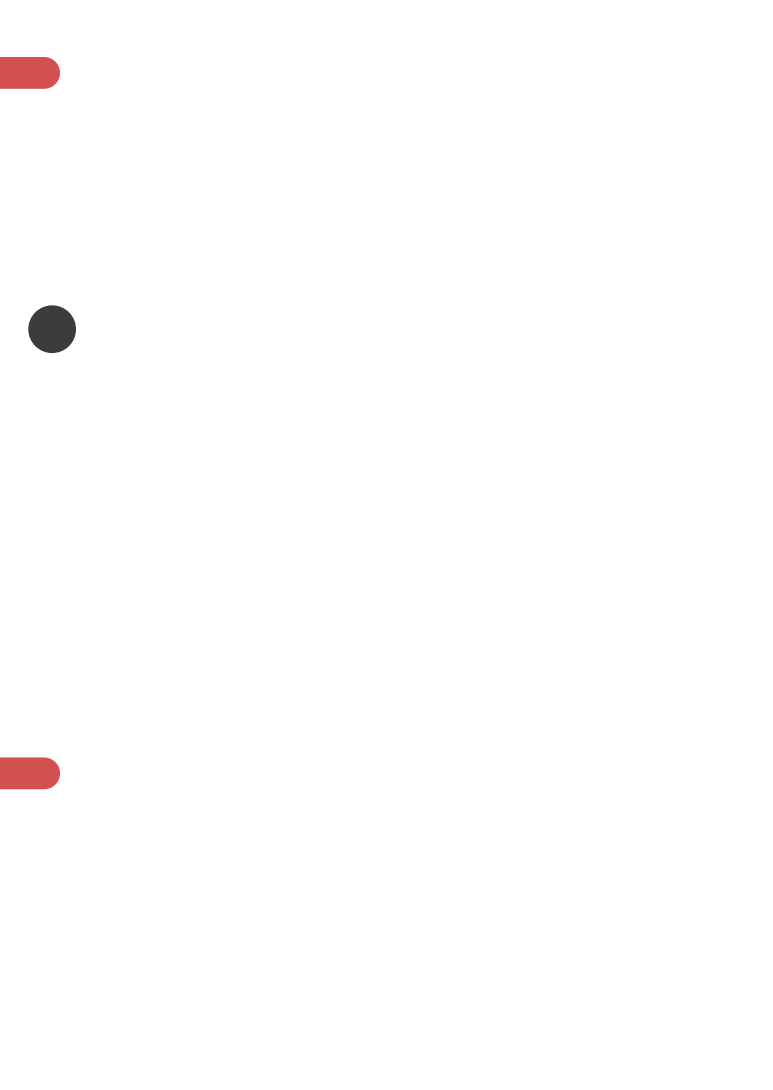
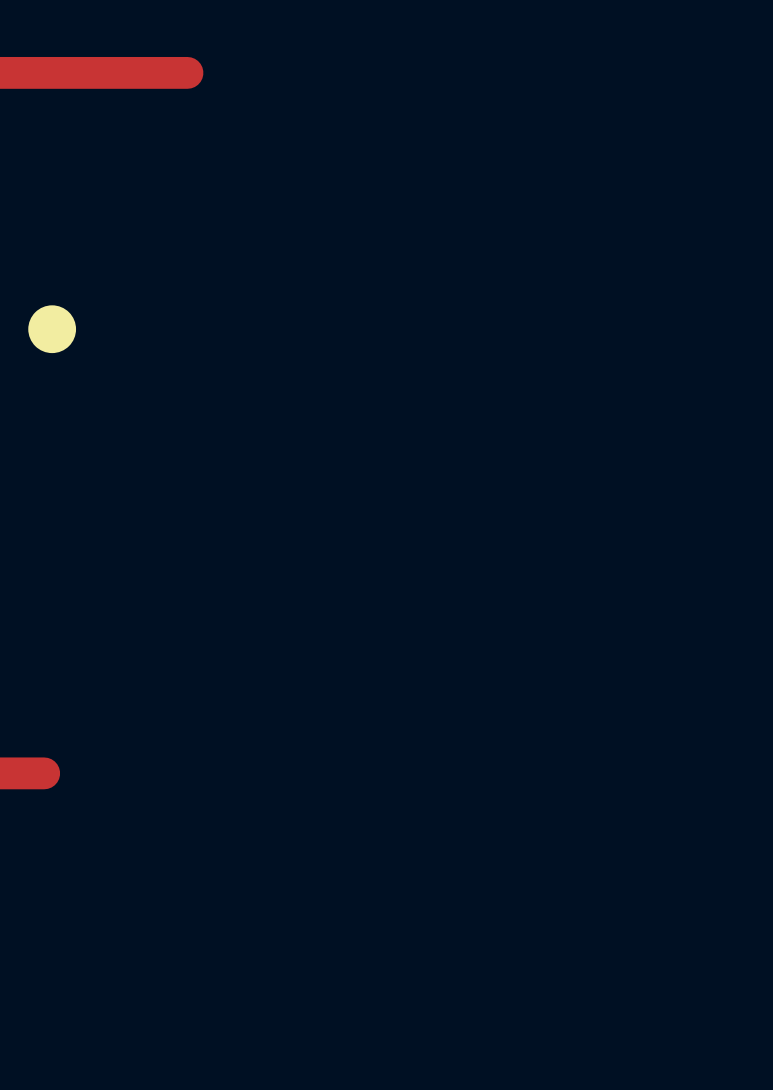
top track: none -> (44, 72) (187, 72)

